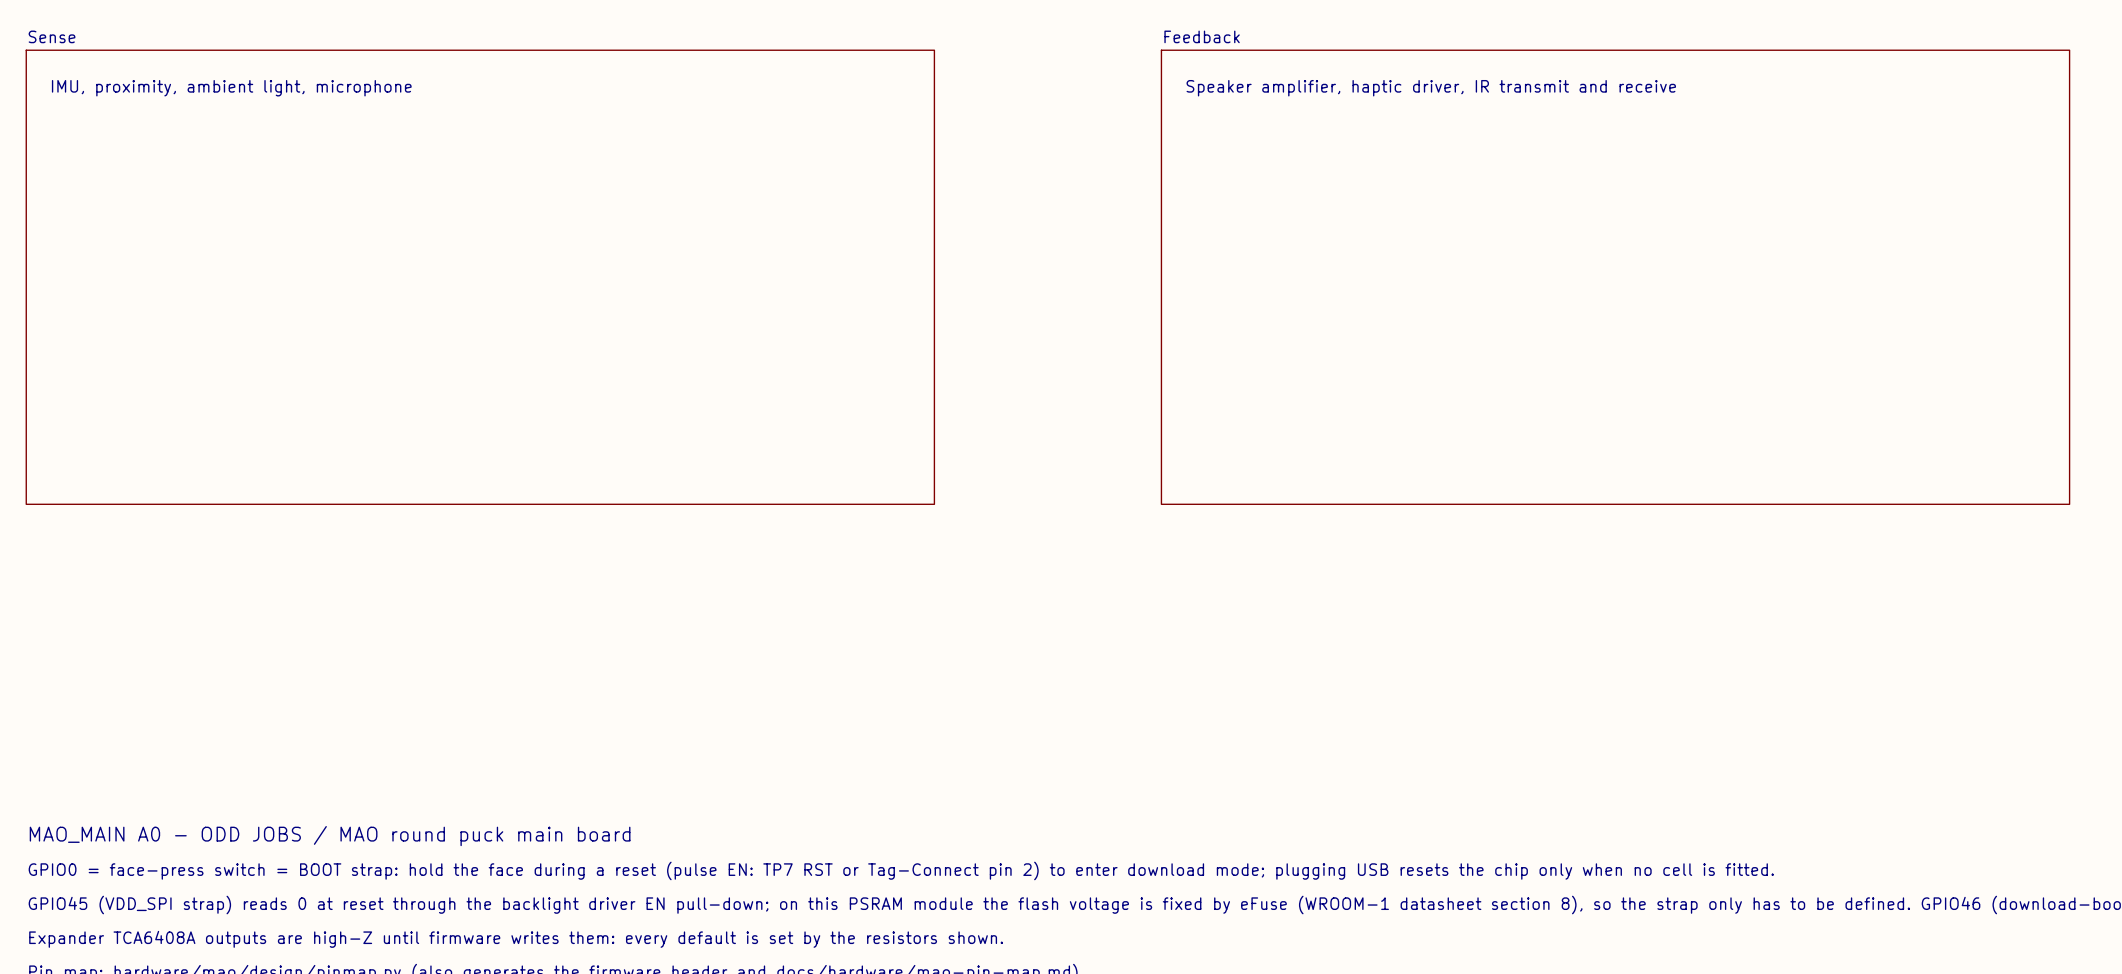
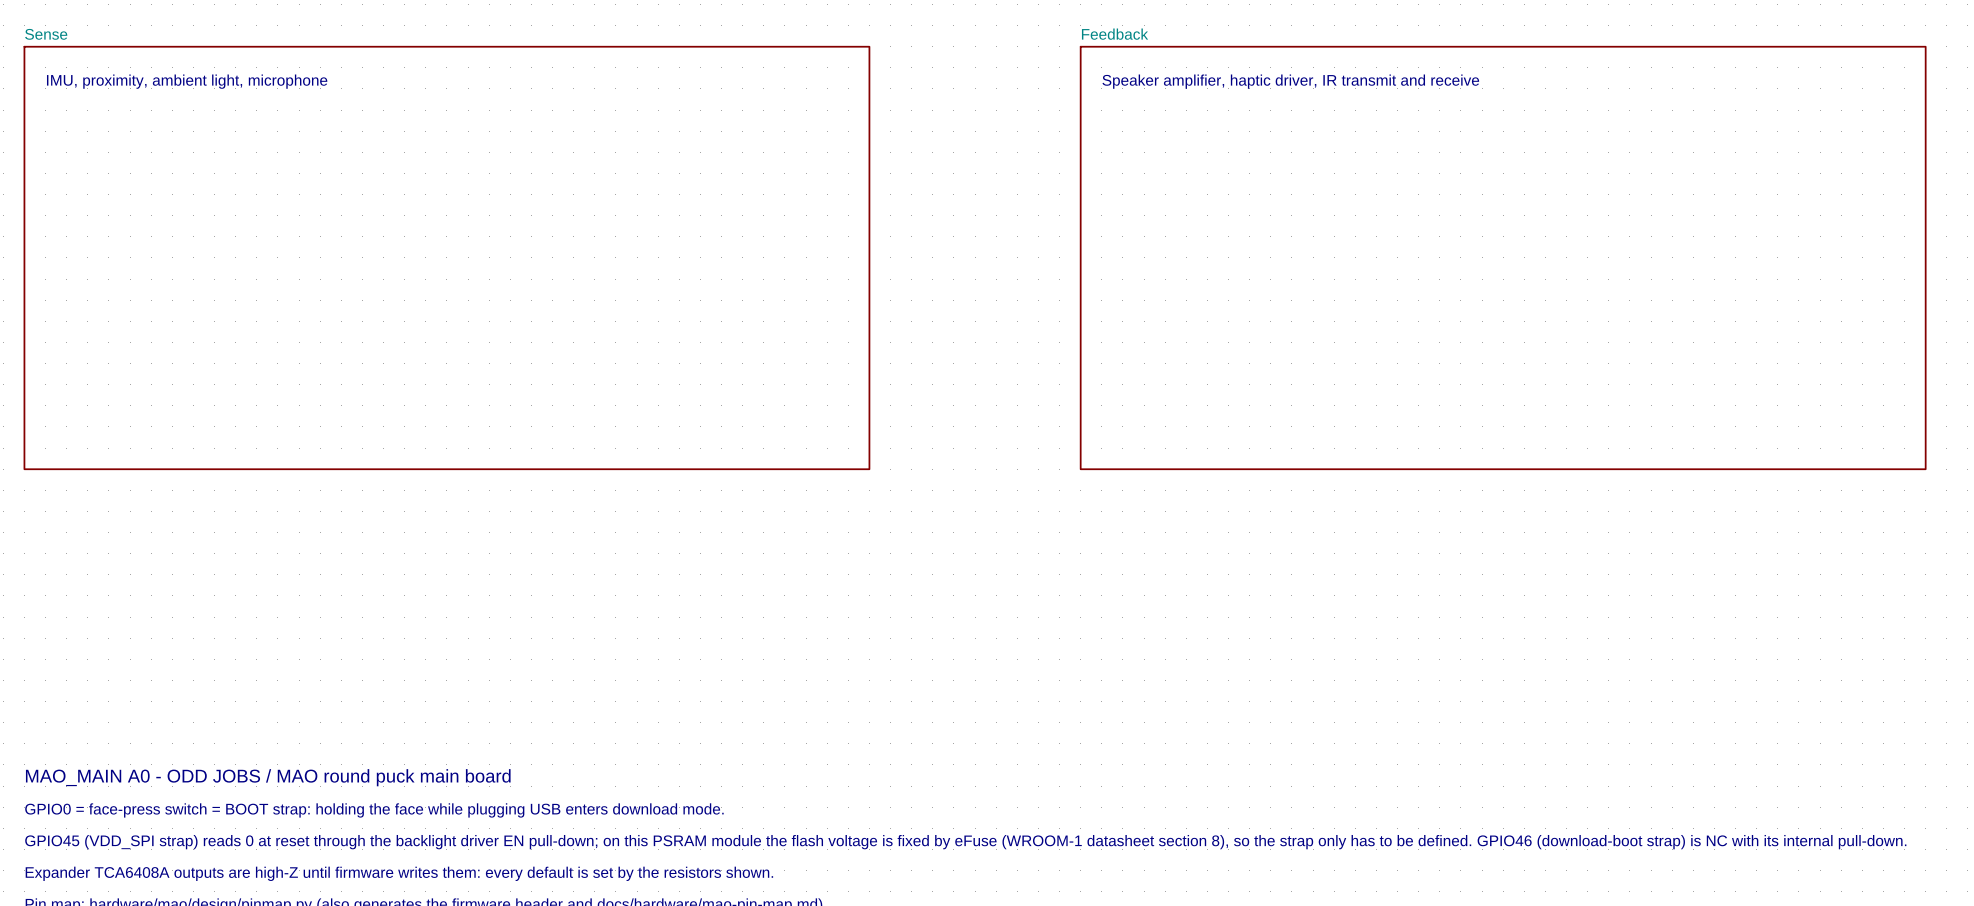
text: GPIO0 = face-press switch = BOOT strap: hold the face during a reset (pulse EN: TP7 RST or Tag-Connect pin 2) to enter download mode; plugging USB resets the chip only when no cell is fitted. (901, 870) -> GPIO0 = face-press switch = BOOT strap: holding the face while plugging USB enters download mode. (374, 810)

